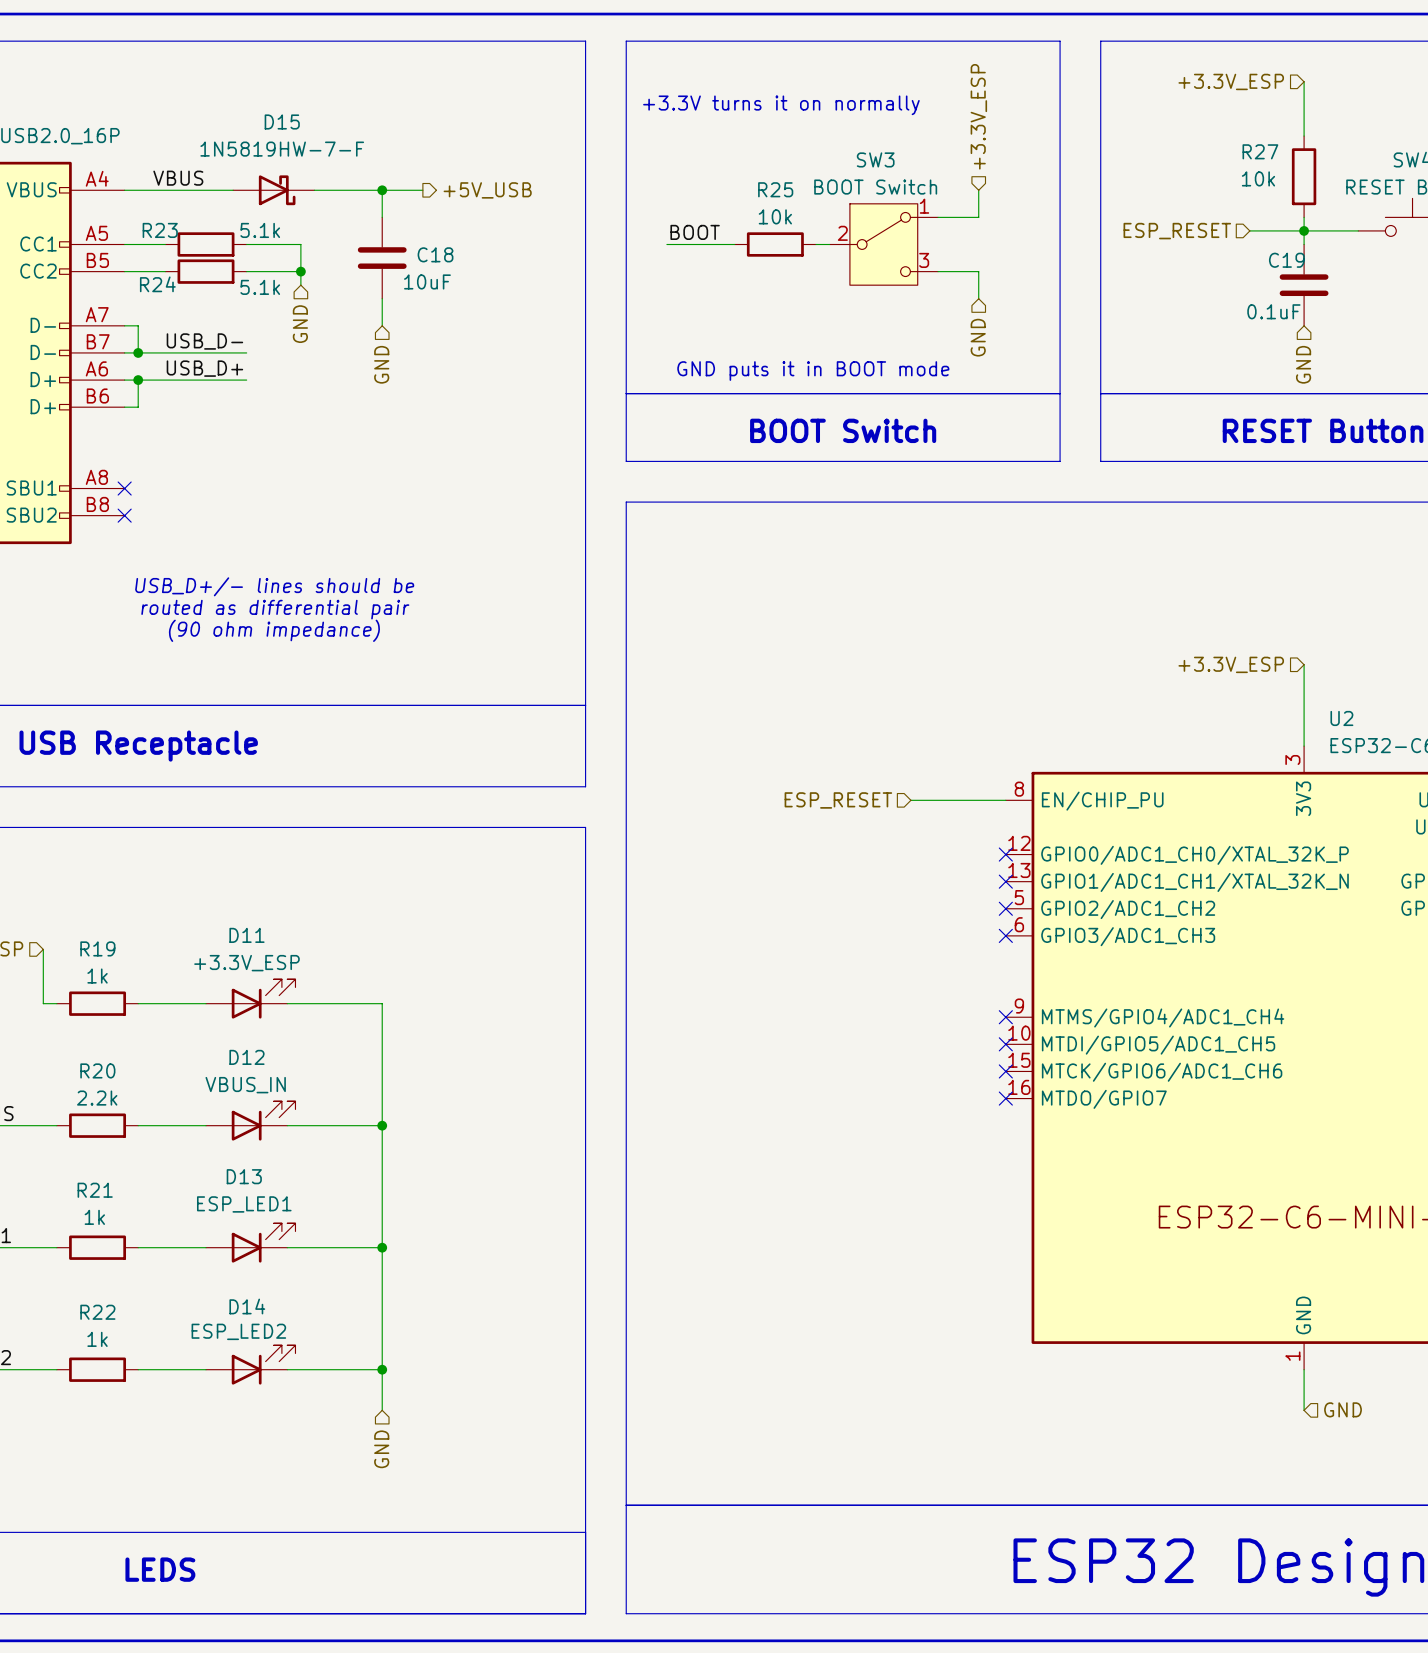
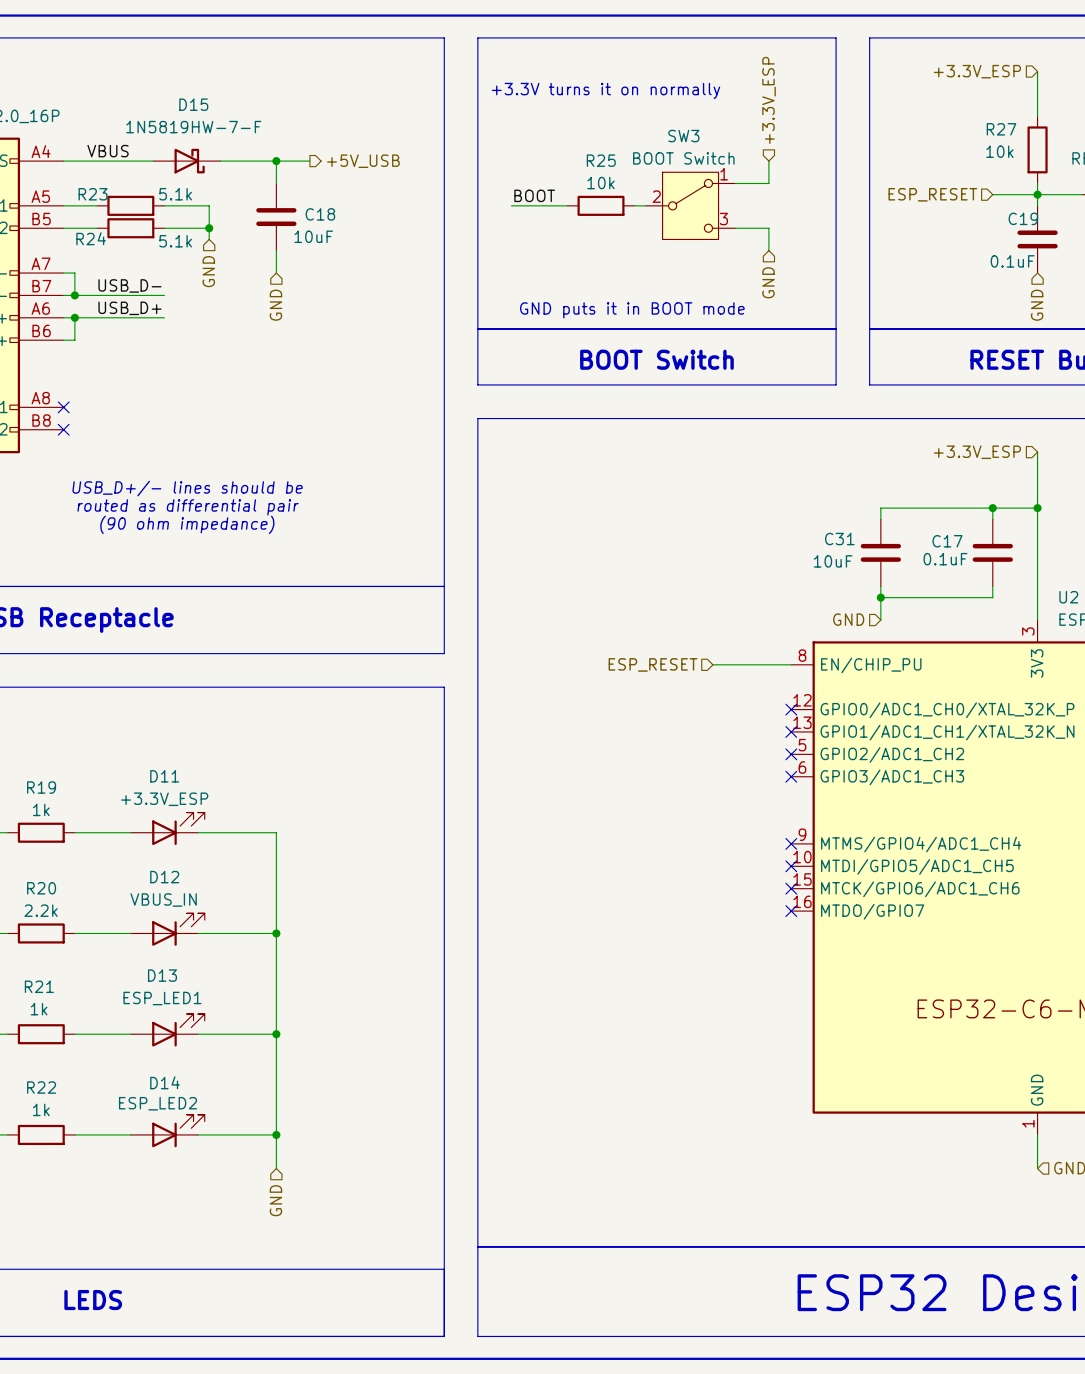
wire: none -> (1037, 452) (1037, 552)
wire: none -> (992, 508) (992, 519)
junction: none -> (992, 508)
wire: none -> (1037, 508) (880, 508) (880, 519)
junction: none -> (1037, 508)
C31: none -> 10uF (880, 552)
hierarchical label position: +3.3V_ESP (1231, 664) -> +3.3V_ESP (977, 452)
C17: none -> 0.1uF (992, 552)
wire: none -> (880, 586) (880, 620)
wire: none -> (992, 586) (992, 597) (880, 597)
junction: none -> (880, 597)
hierarchical label: none -> GND (848, 619)

